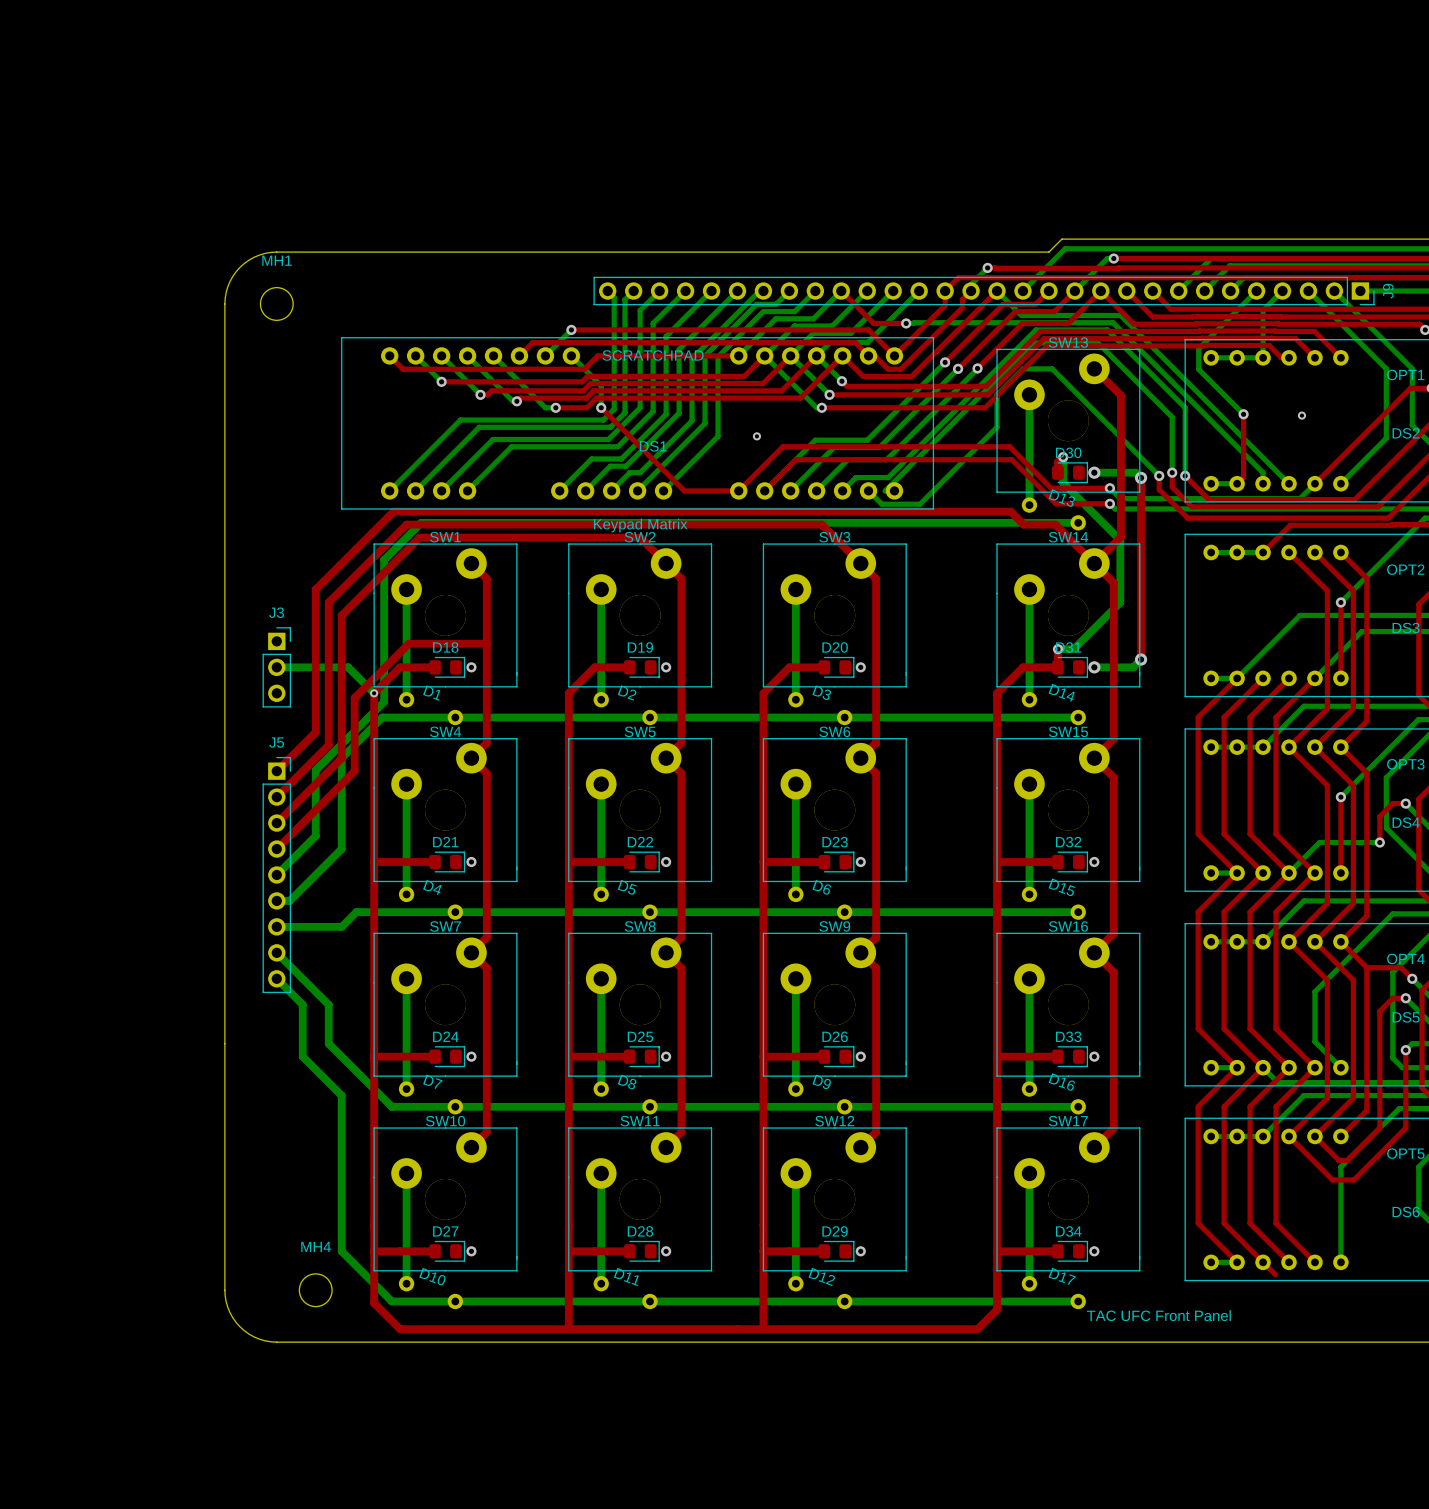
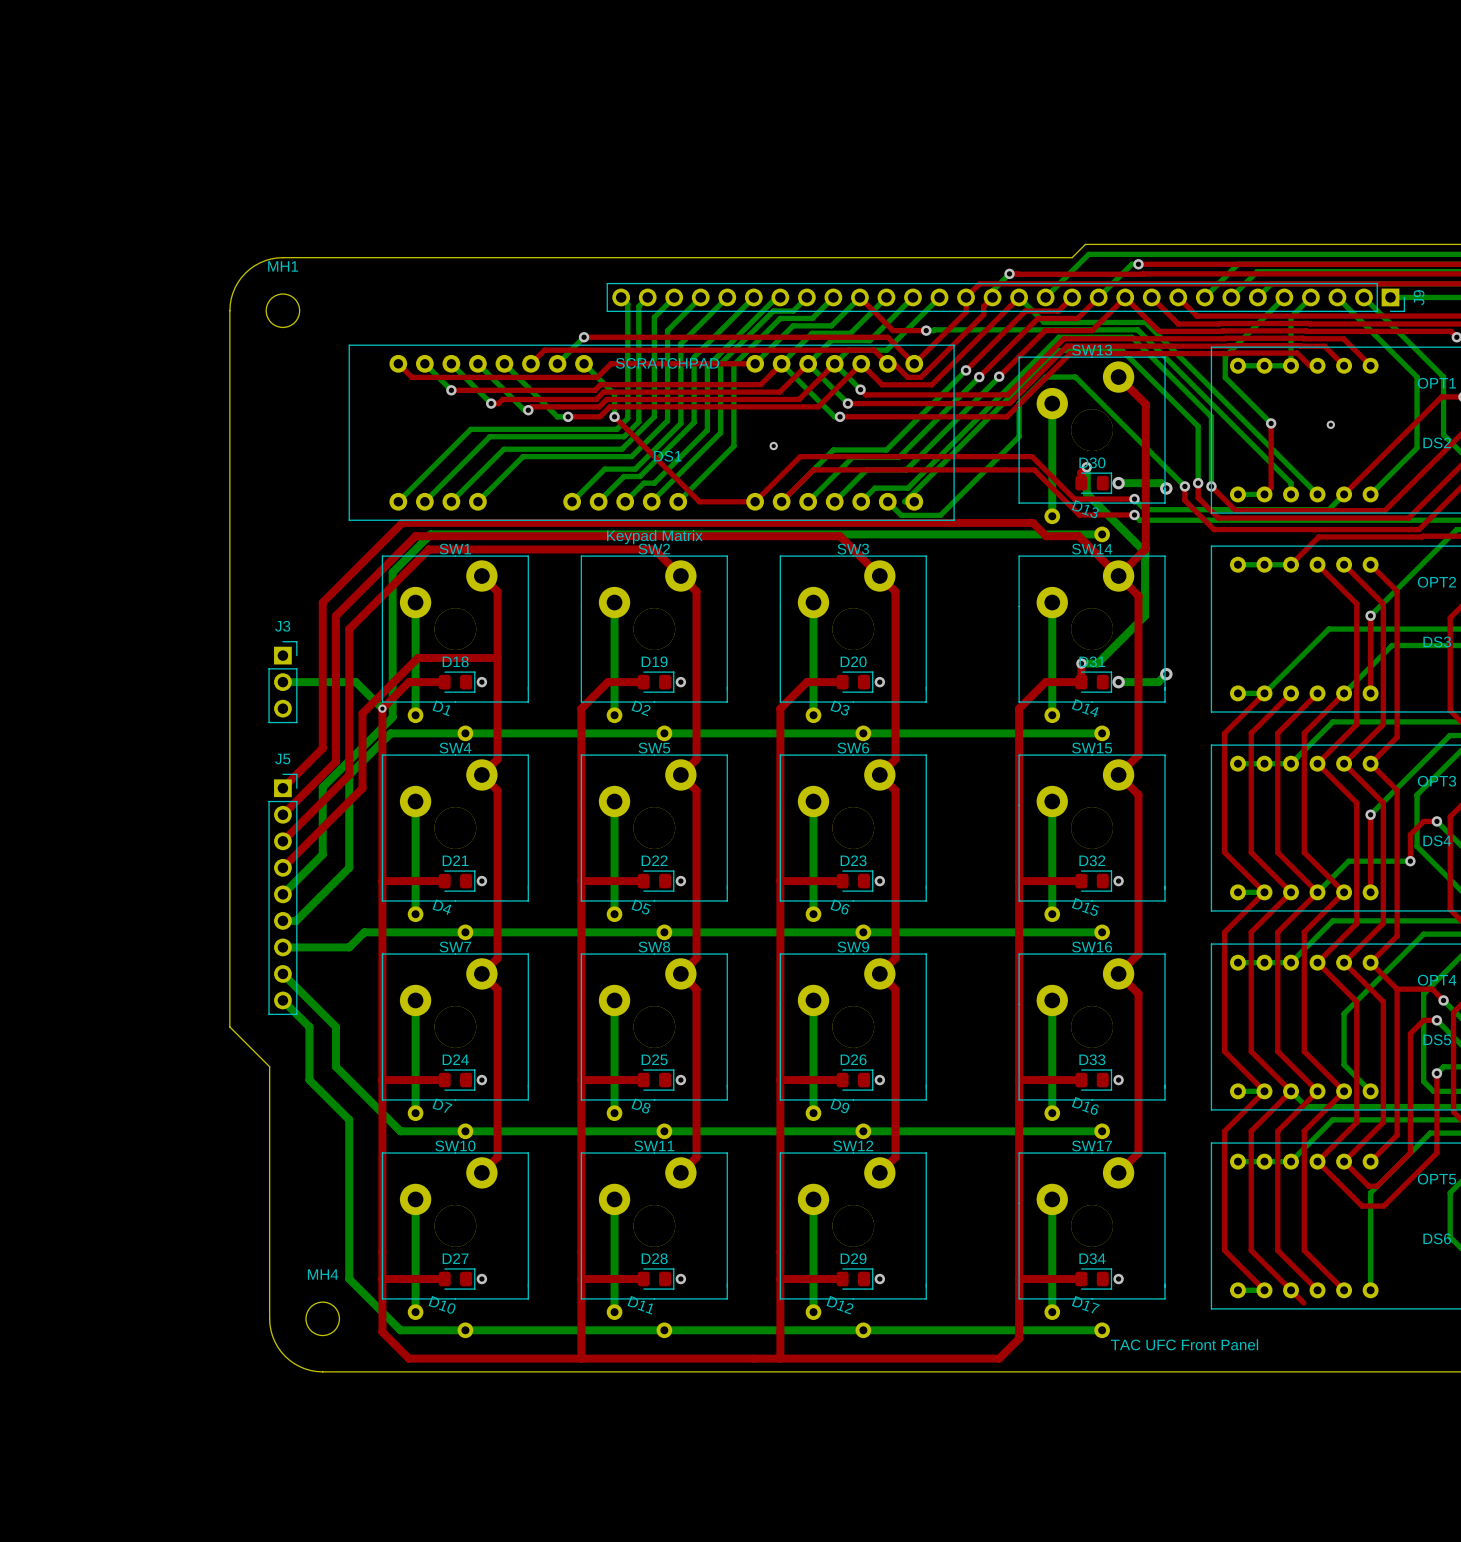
top track: (1141, 477) (1141, 659) -> none
board edge: (224, 1004) (226, 1301) (236, 1322) (254, 1337) (270, 1341) (315, 1342) -> (229, 1027) (269, 1066) (270, 1330) (277, 1347) (289, 1360) (305, 1368) (322, 1371)

